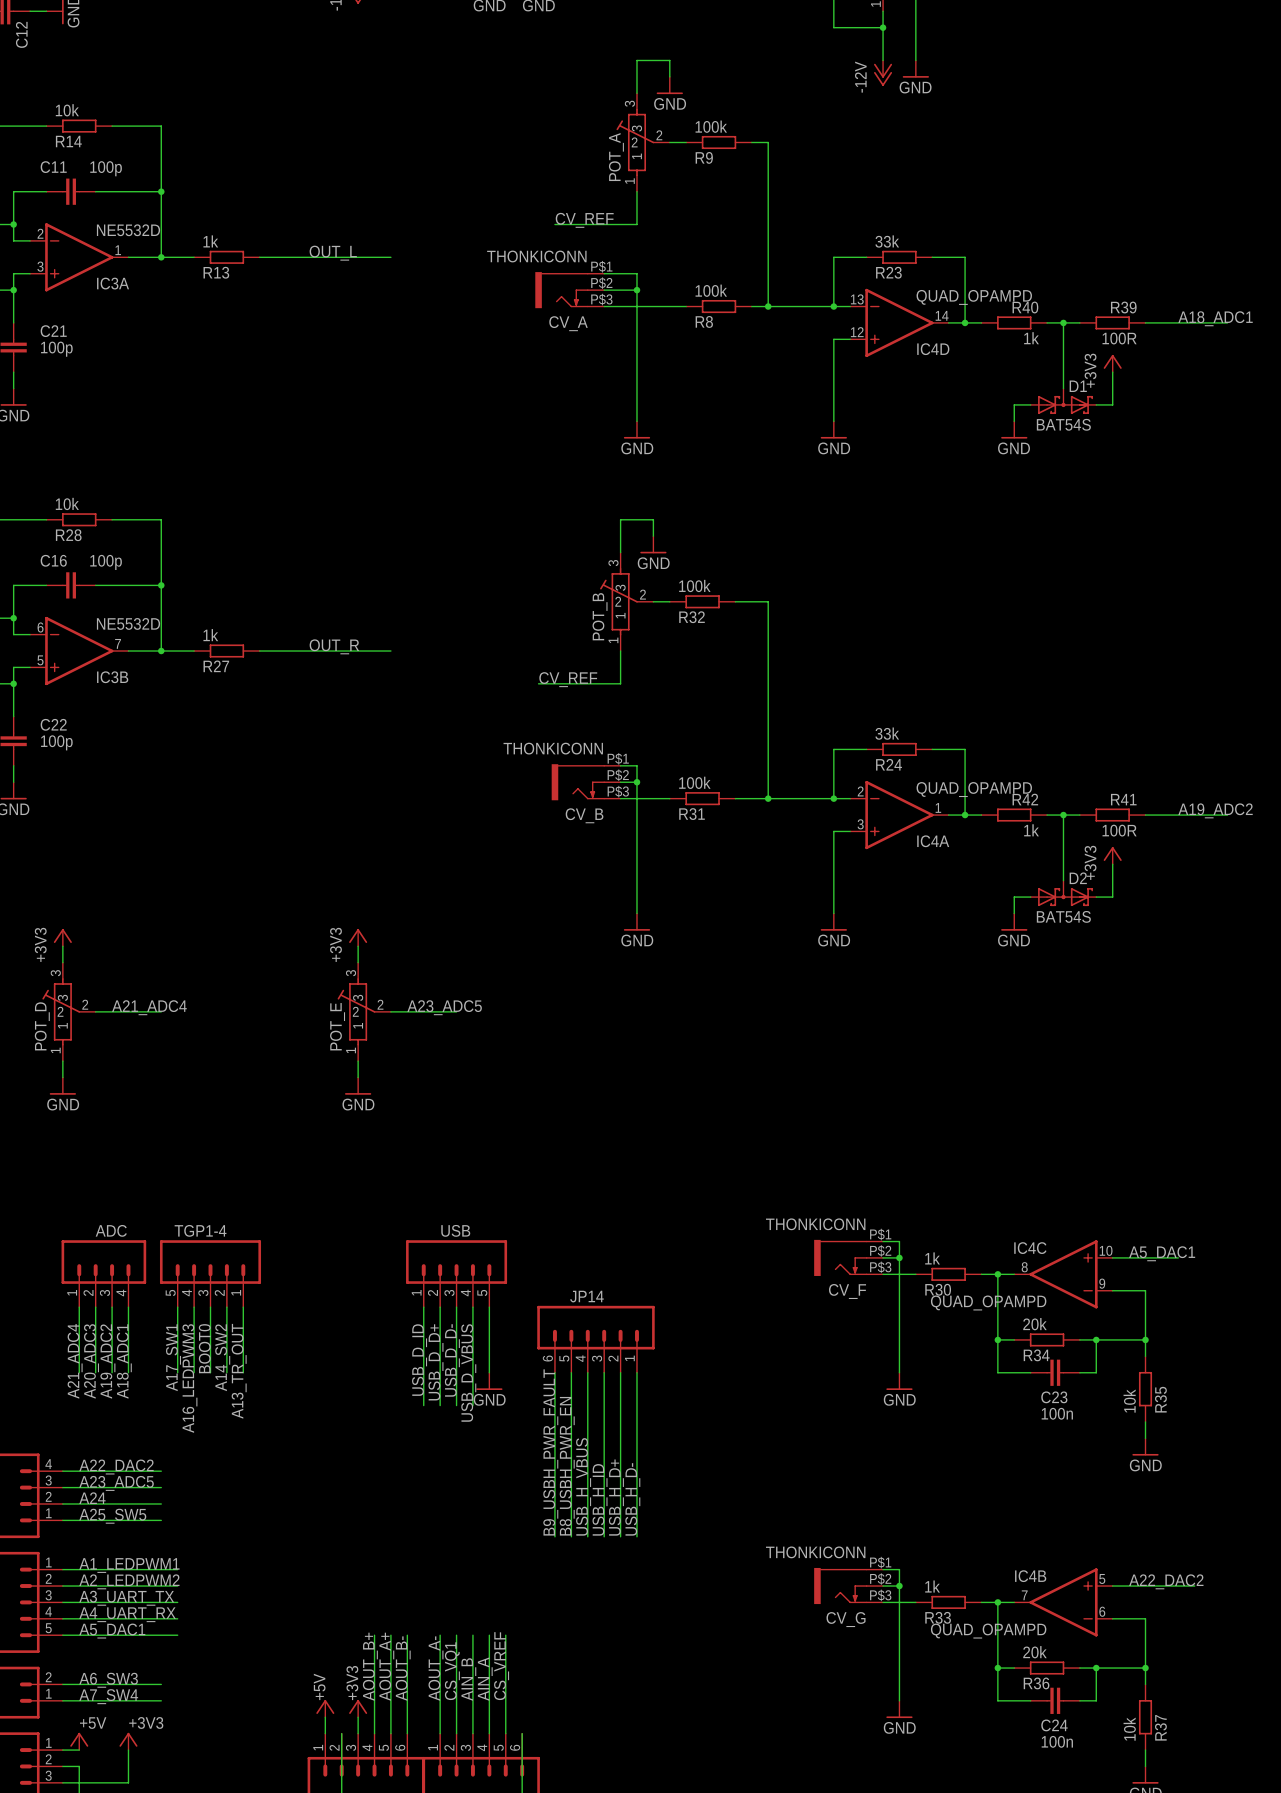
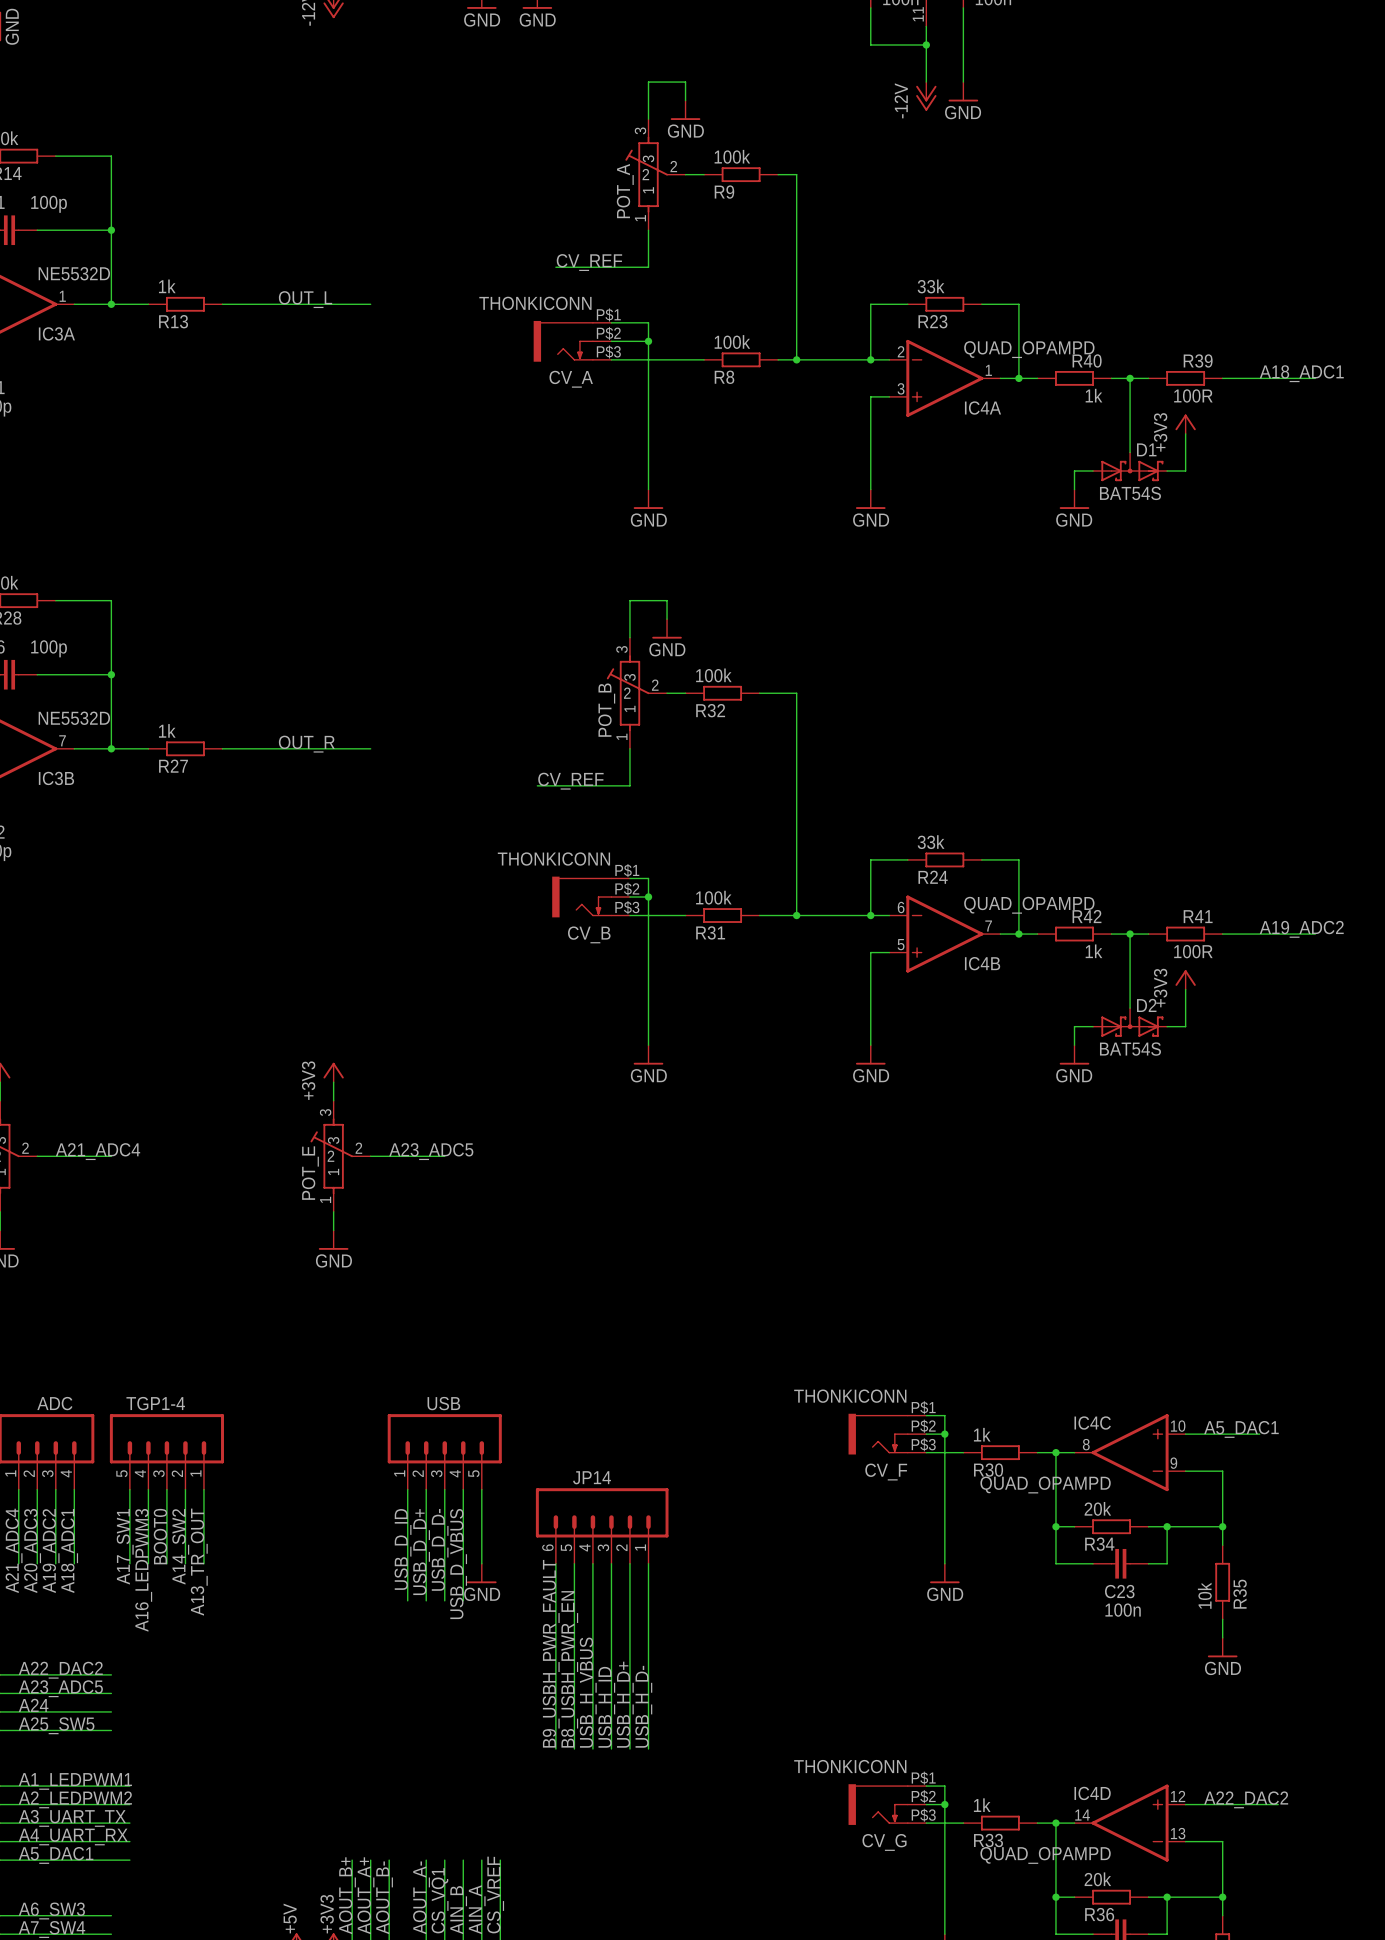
IC4D rotation: 0° (899, 322) -> 180° (1130, 1823)
IC4D position: (899, 322) -> (1130, 1823)
IC4A position: (899, 815) -> (944, 378)
IC4B rotation: 0° (1063, 1602) -> 180° (944, 934)
IC4B position: (1063, 1602) -> (944, 934)

